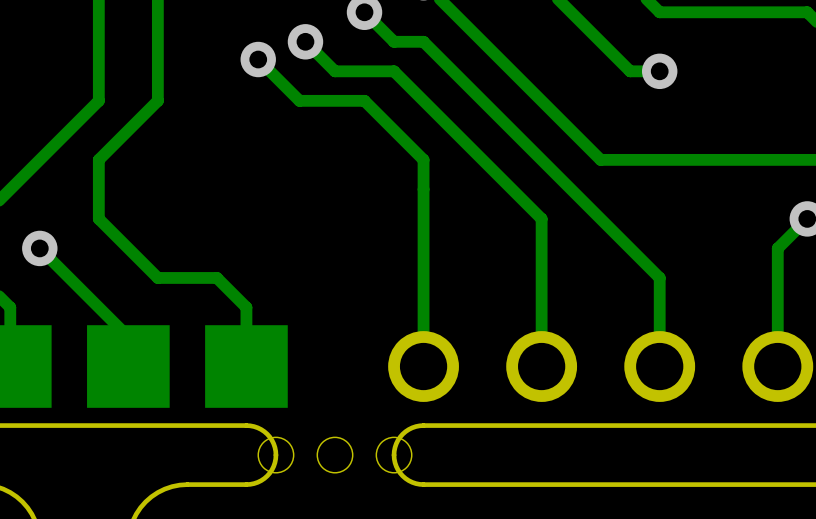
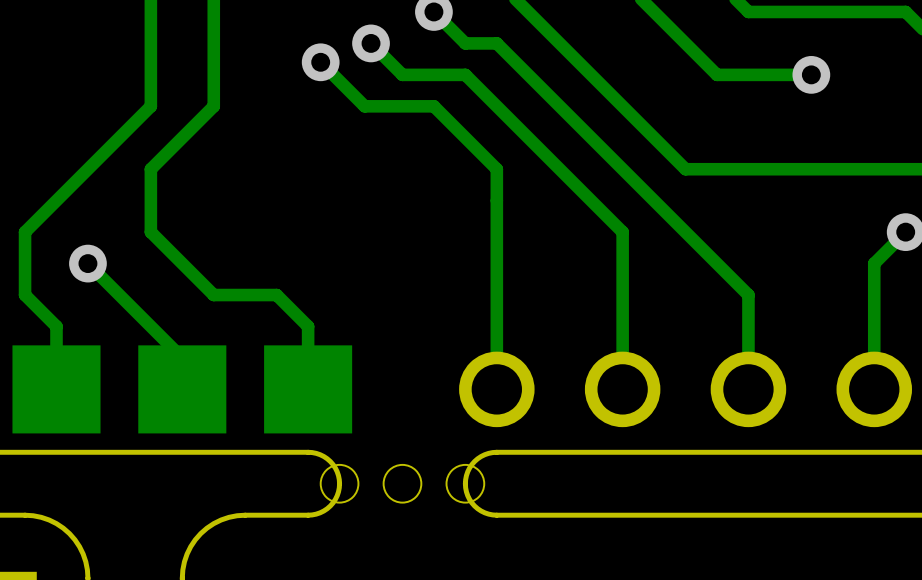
via position: (659, 71) -> (811, 74)
track: none -> (811, 74) (748, 74)

